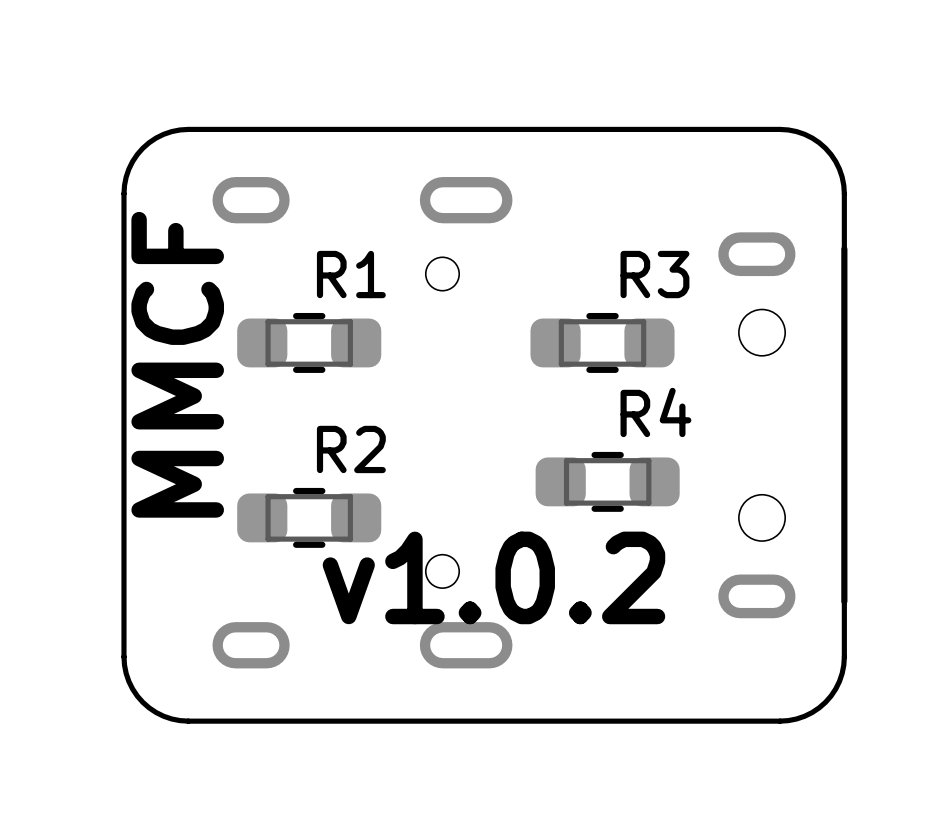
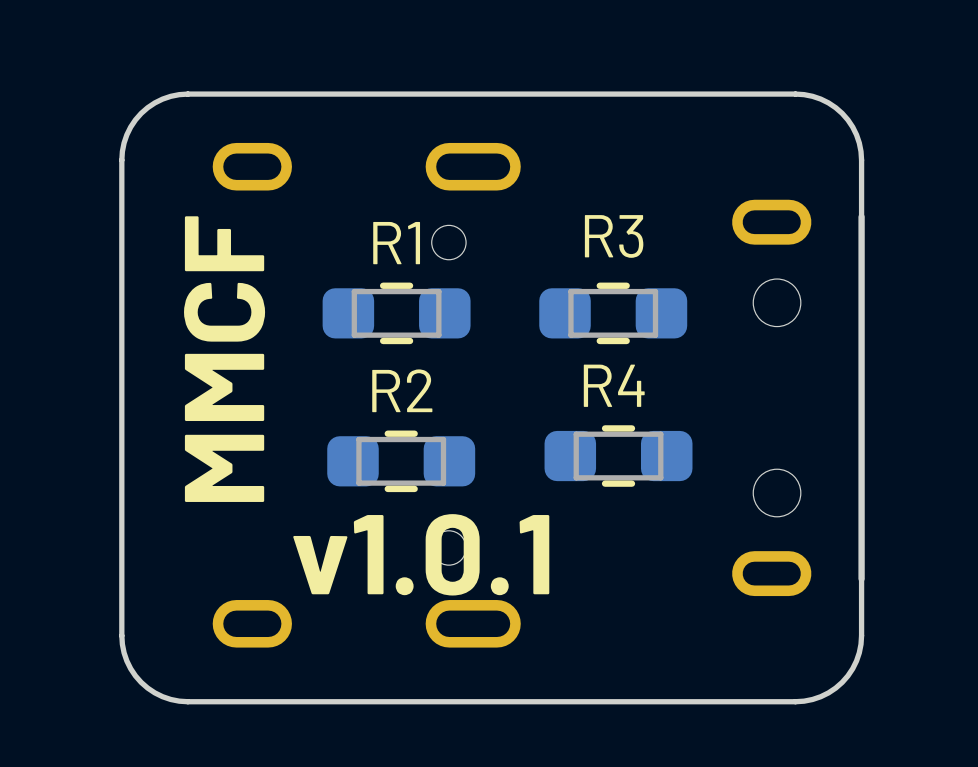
R1 name position: R1 (351, 274) -> R1 (396, 243)
R3 name position: R3 (654, 274) -> R3 (614, 236)
R1 position: (309, 342) -> (396, 313)
text position: MMCF (177, 364) -> MMCF (224, 359)
R4 name position: R4 (655, 412) -> R4 (614, 385)
R2 name position: R2 (351, 449) -> R2 (402, 390)
R2 position: (309, 517) -> (401, 461)
text: v1.0.2 (493, 577) -> v1.0.1 (421, 554)

